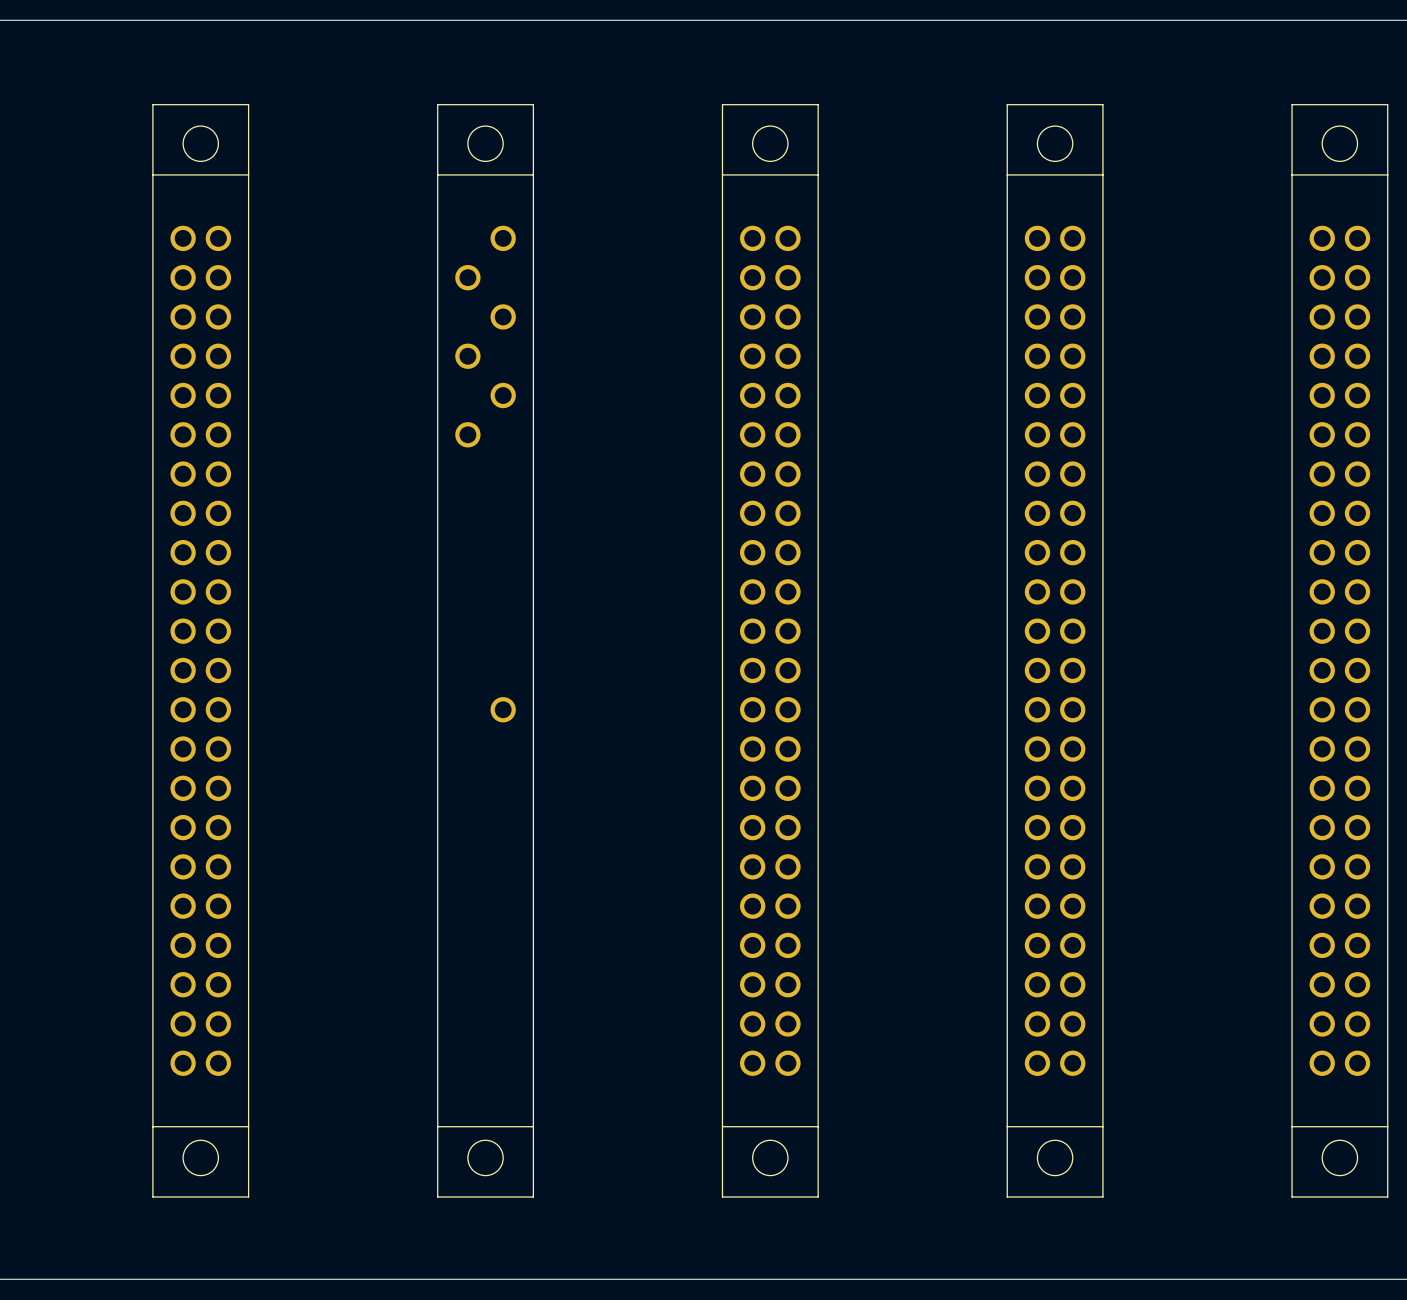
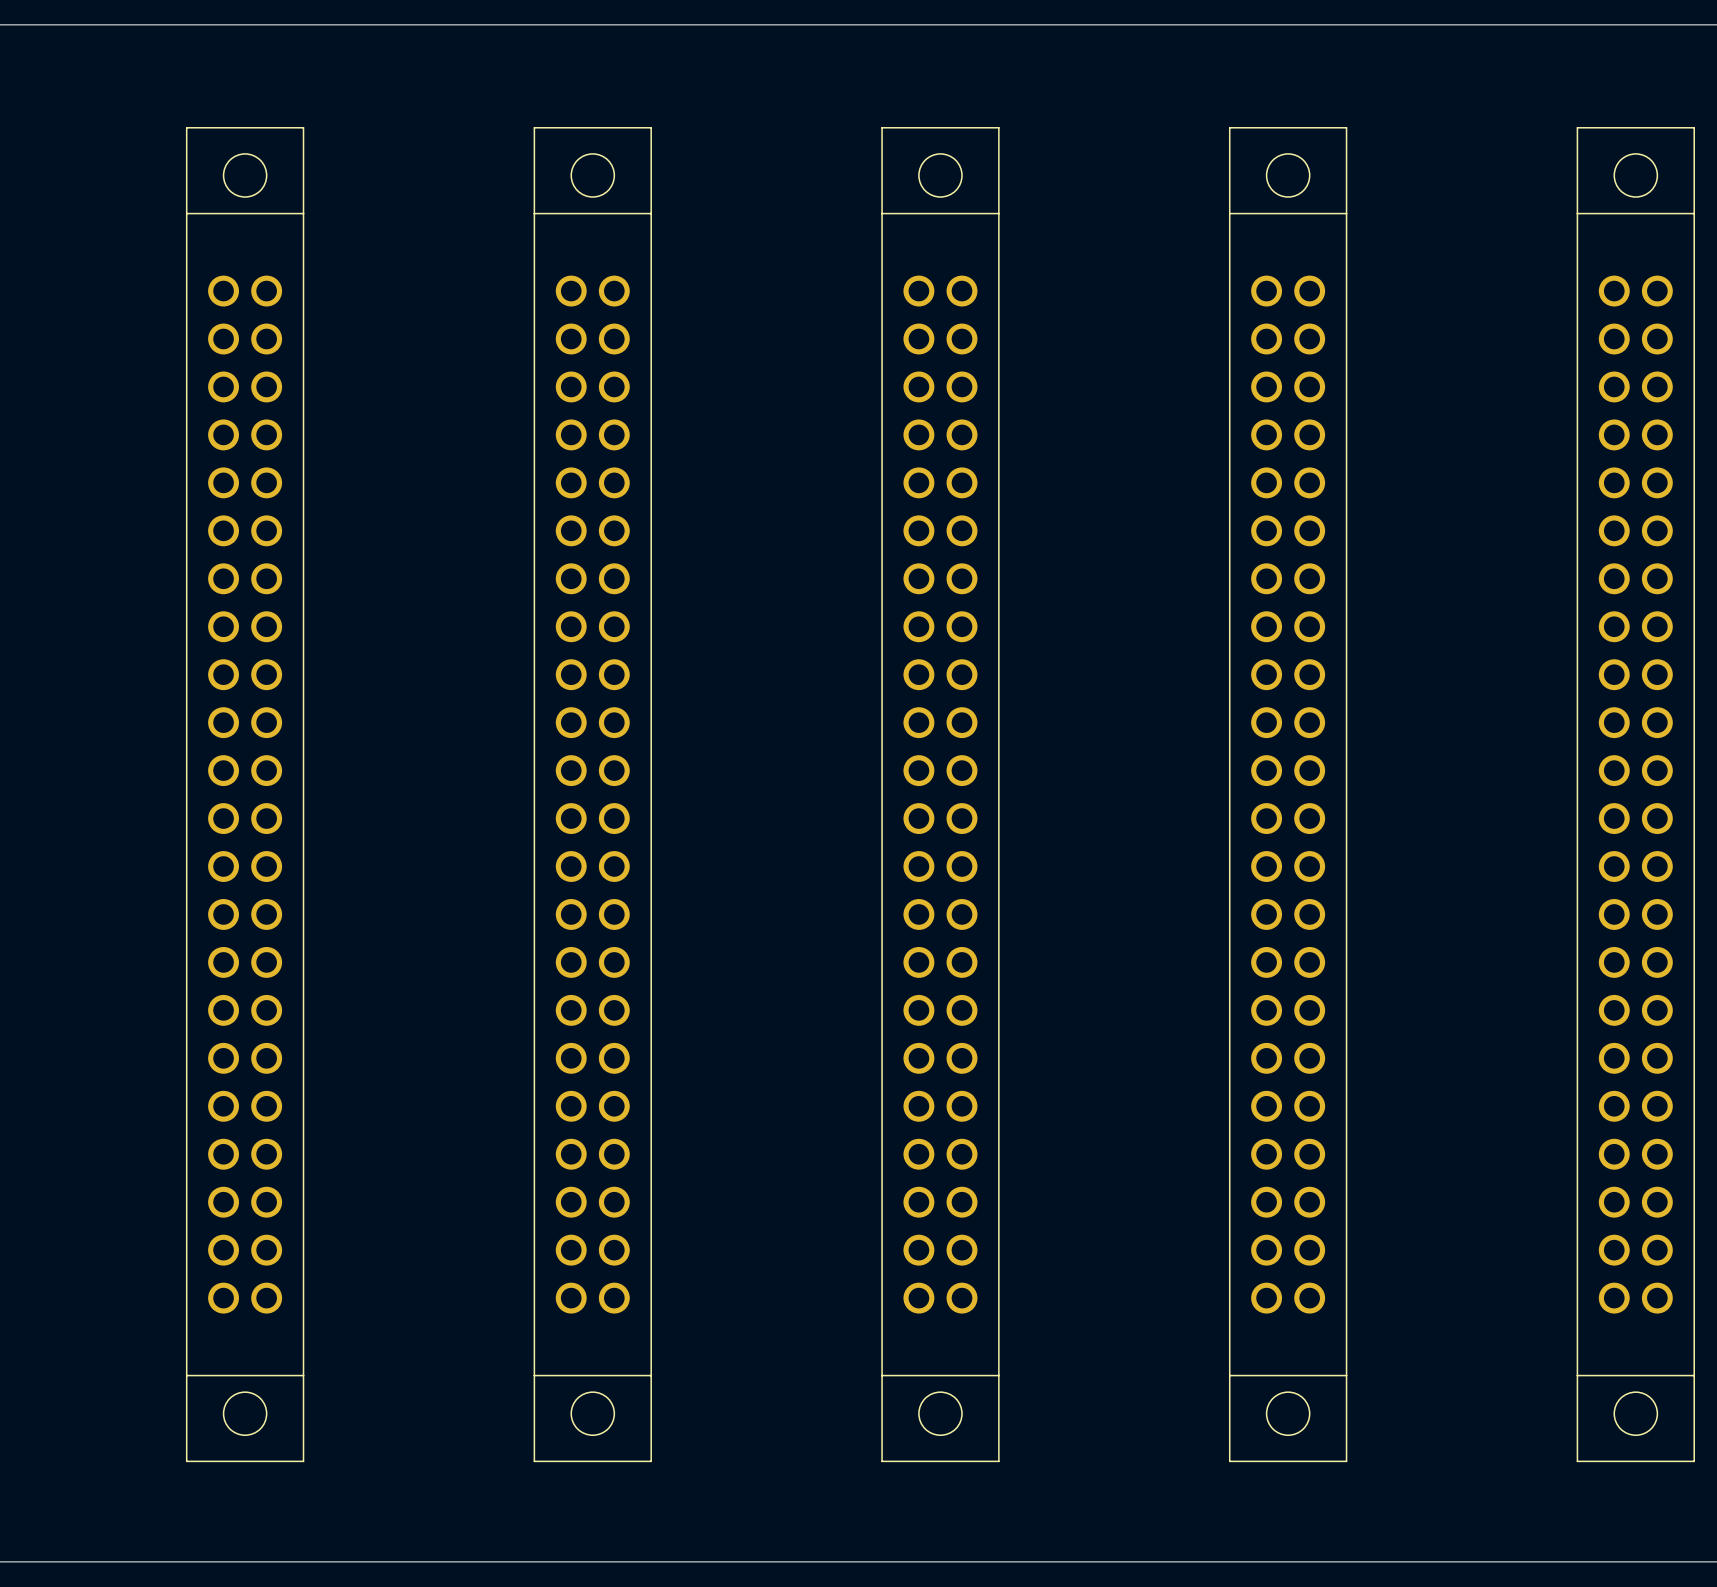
part footprint: [437, 104, 535, 1198] -> [533, 127, 652, 1463]

